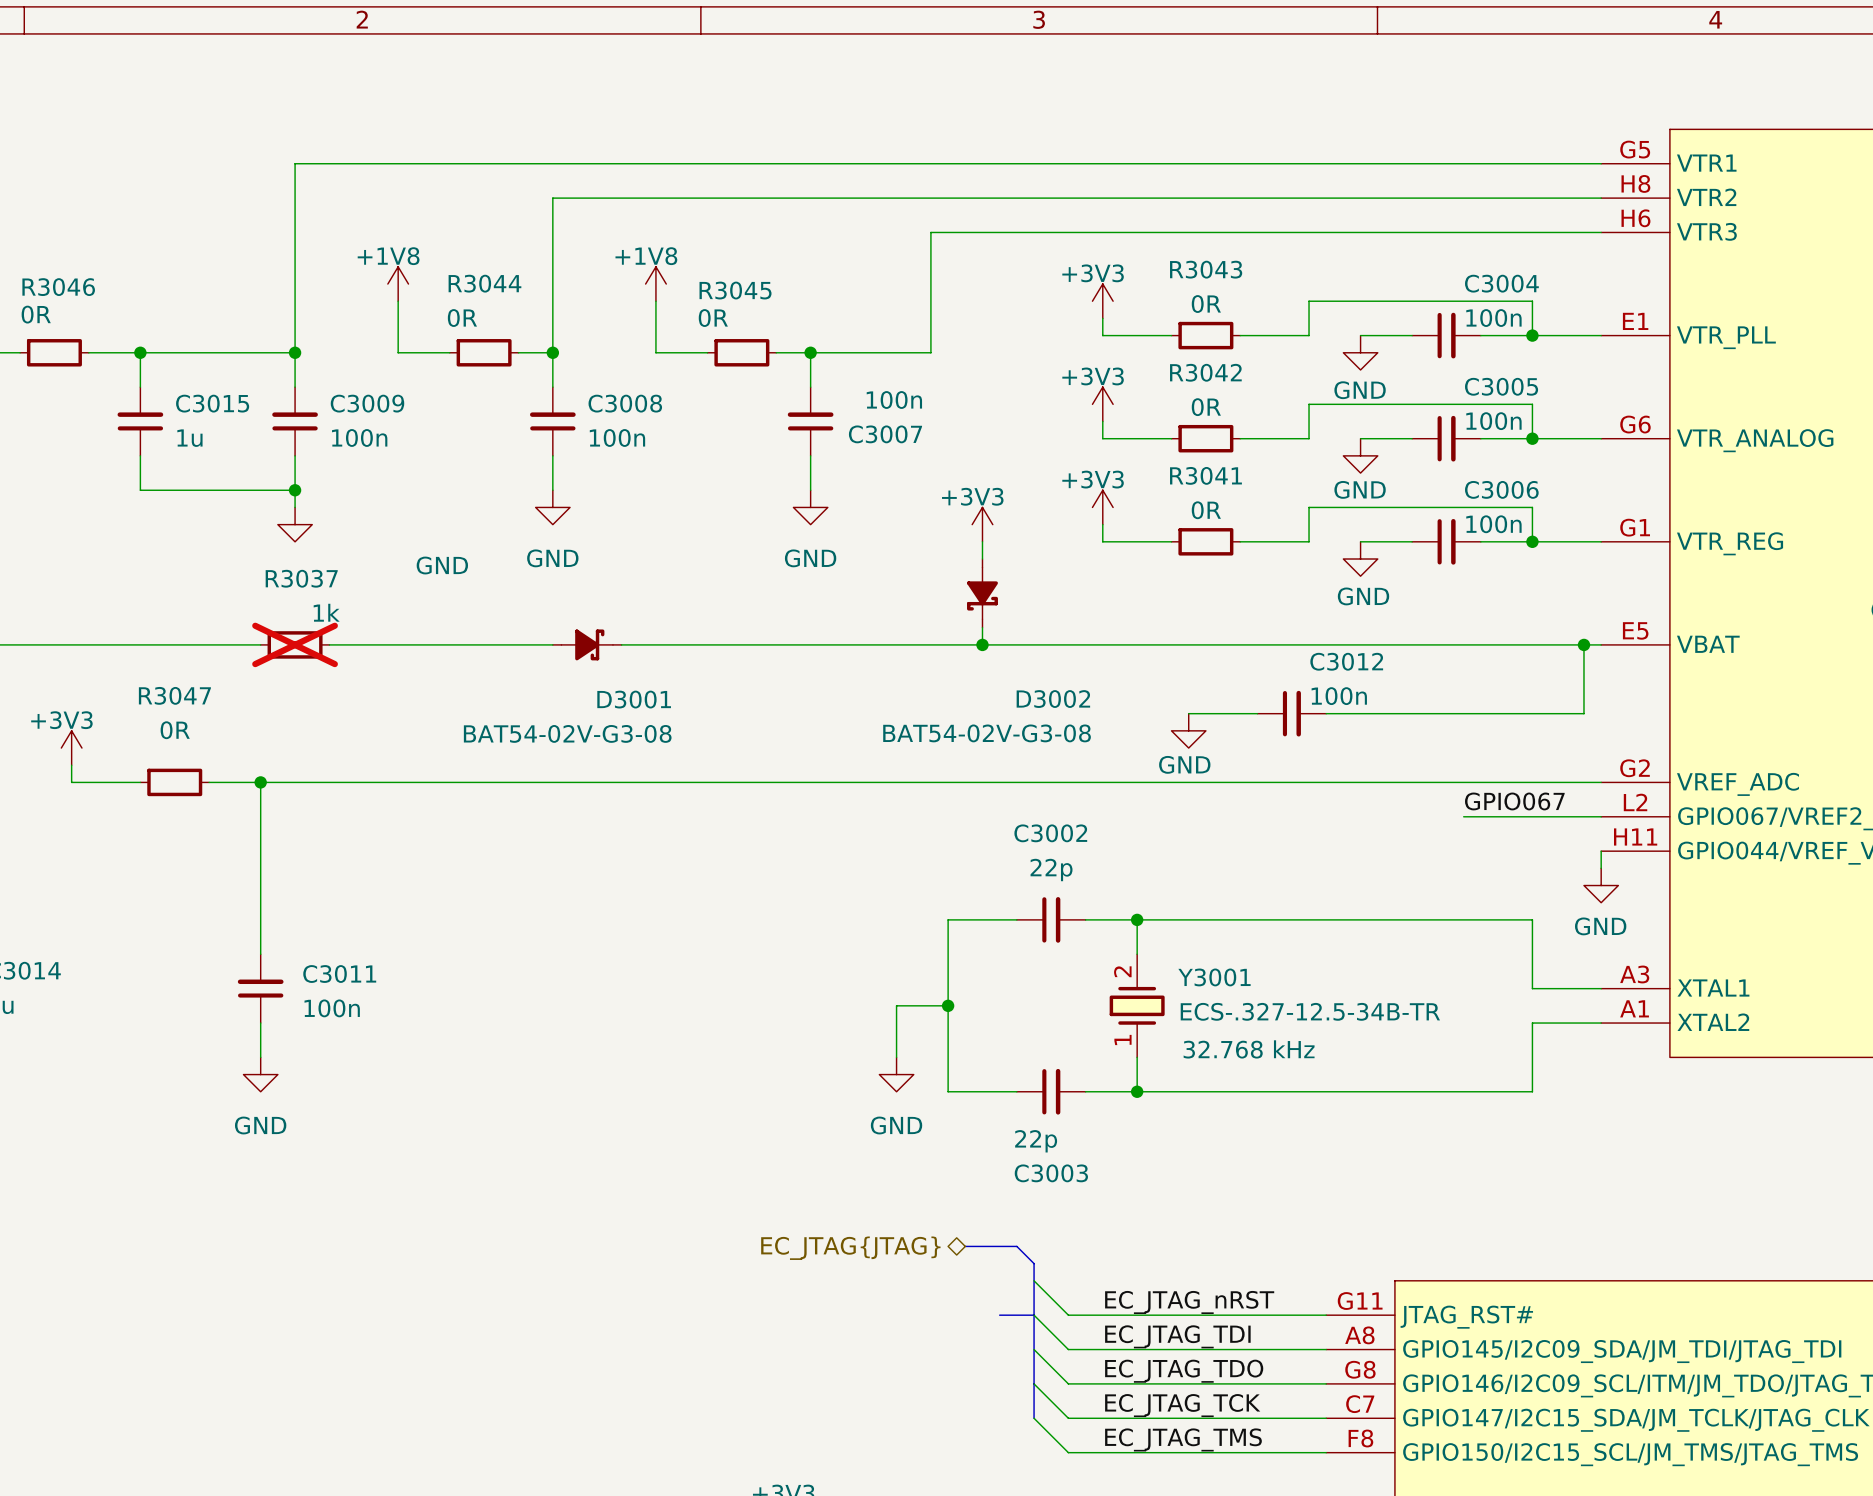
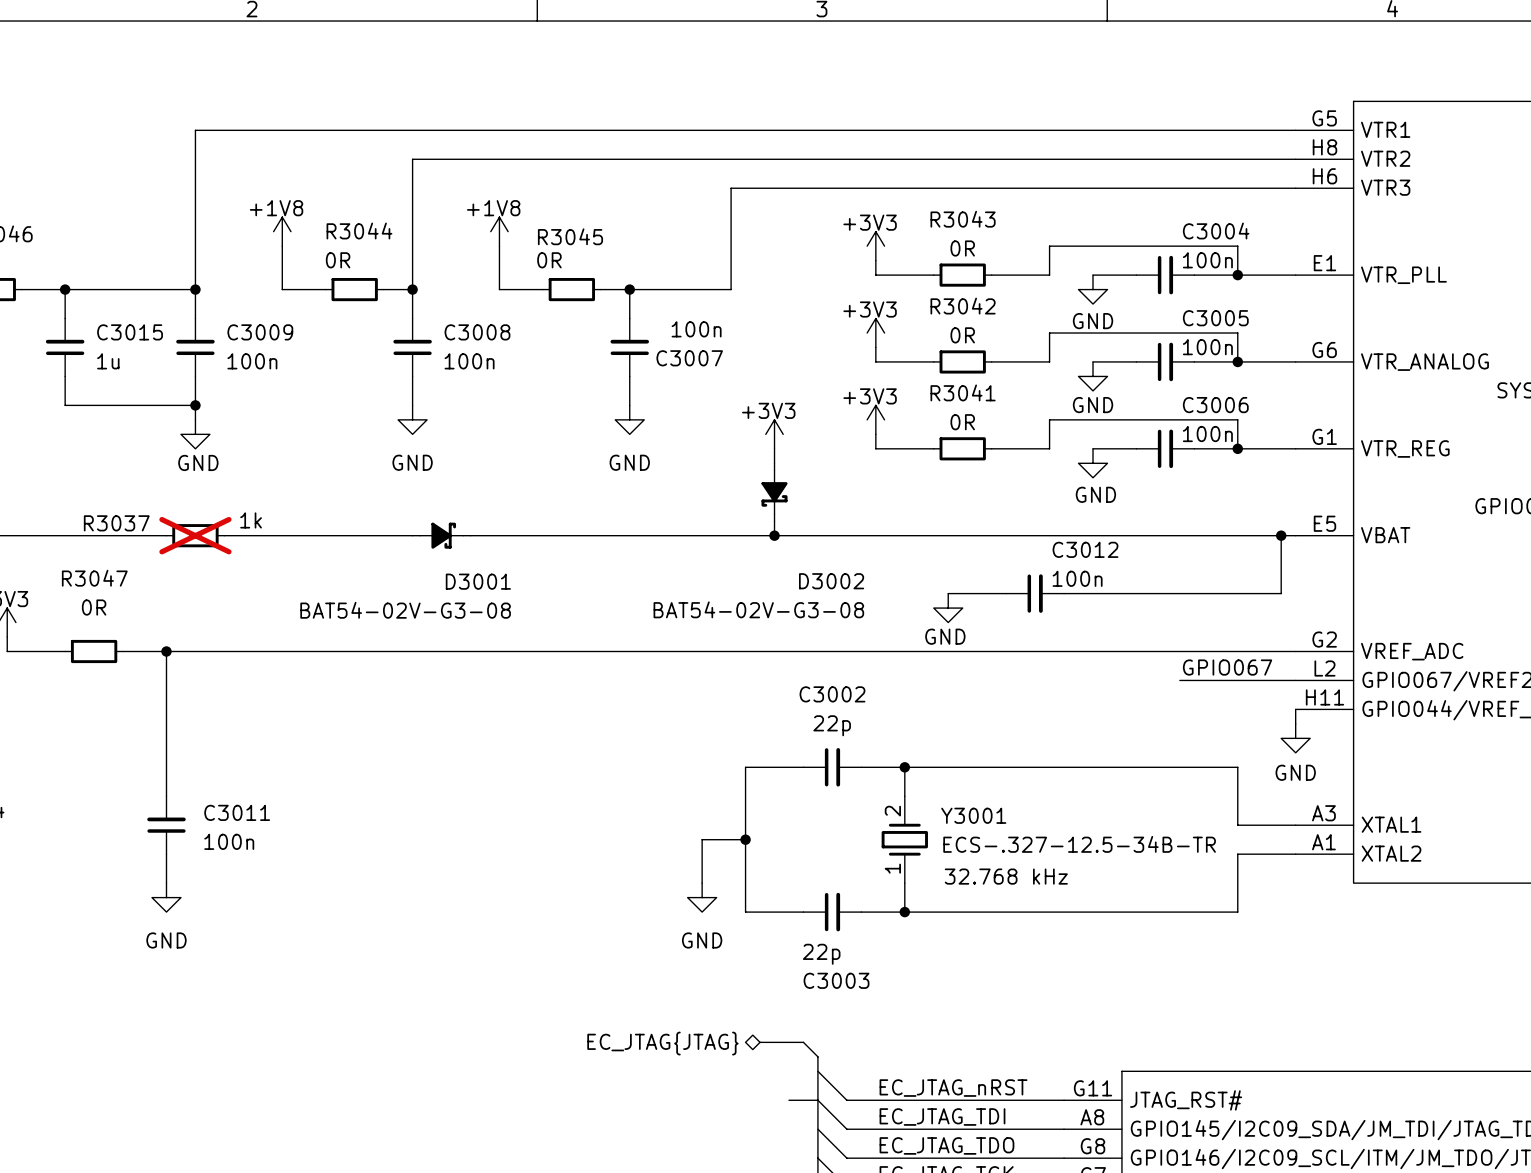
power symbol text position: GND (442, 565) -> GND (198, 462)
R3037 name position: R3037 (301, 578) -> R3037 (116, 523)
R3037 text position: 1k (326, 612) -> 1k (251, 520)

